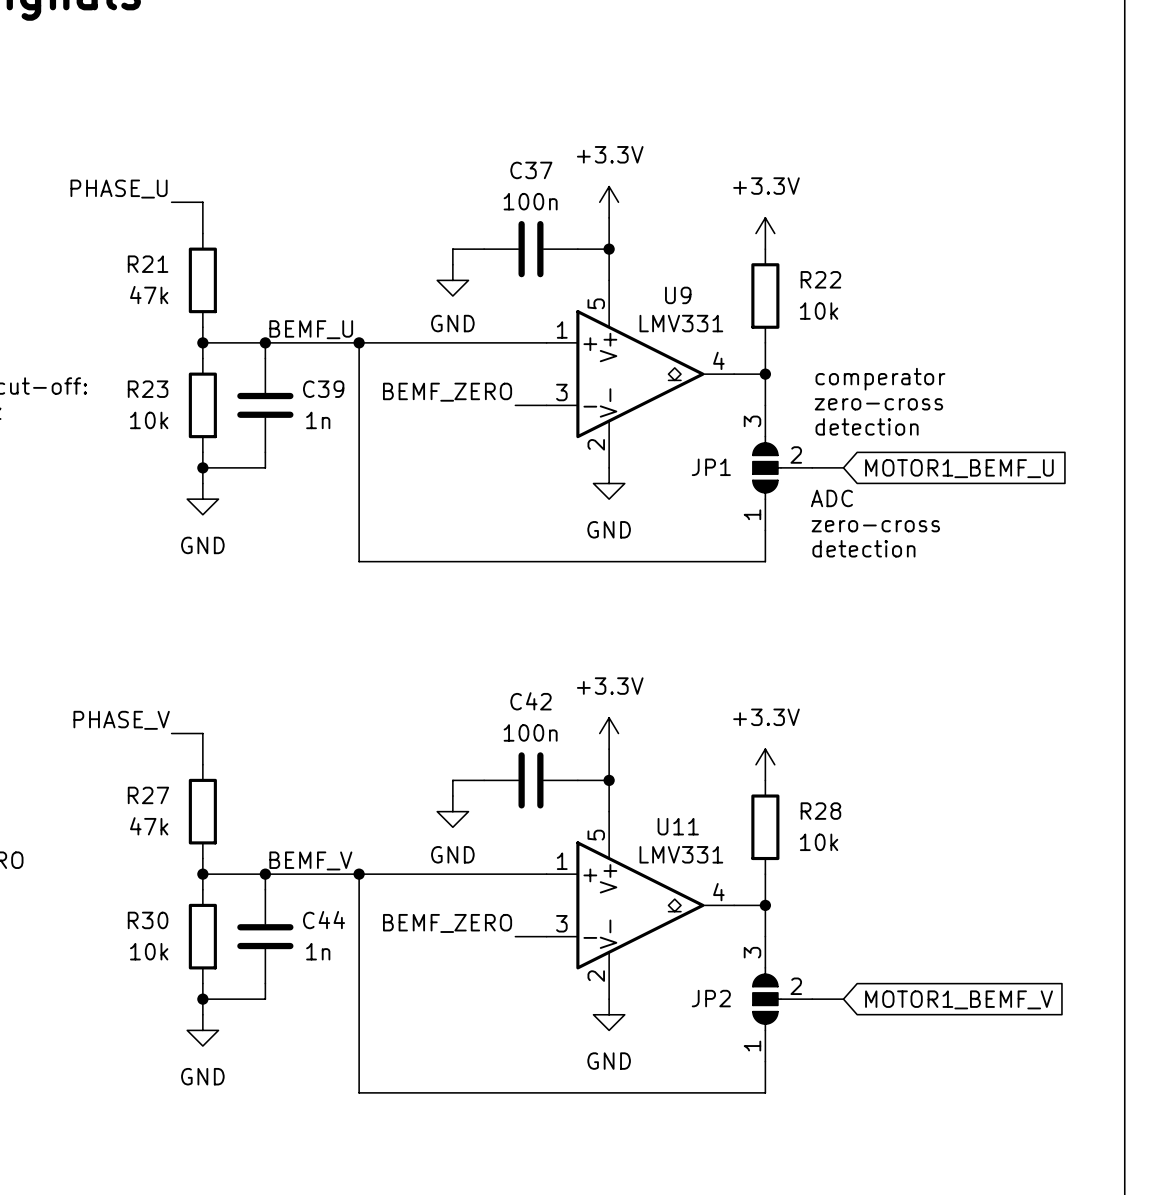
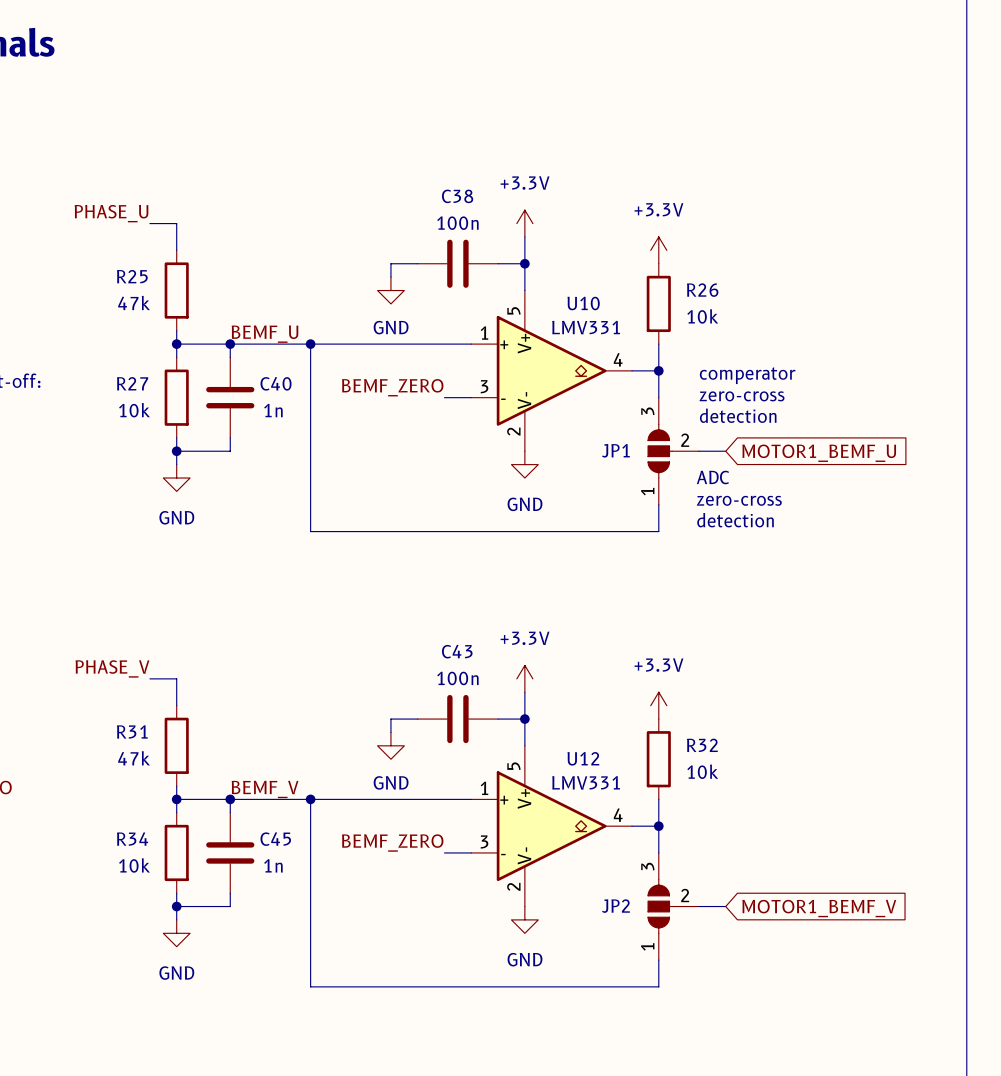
C37 name: C37 (531, 170) -> C38 (457, 196)
R21 name: R21 (148, 264) -> R25 (132, 276)
R22 name: R22 (820, 279) -> R26 (702, 290)
U9 name: U9 (678, 295) -> U10 (583, 303)
R23 name: R23 (148, 389) -> R27 (132, 383)
C39 name: C39 (323, 389) -> C40 (276, 383)
C42 name: C42 (531, 701) -> C43 (457, 651)
R27 name: R27 (148, 795) -> R31 (132, 731)
R28 name: R28 (820, 811) -> R32 (702, 745)
U11 name: U11 (678, 826) -> U12 (583, 758)
R30 name: R30 (148, 920) -> R34 (132, 839)
C44 name: C44 (324, 920) -> C45 (275, 839)

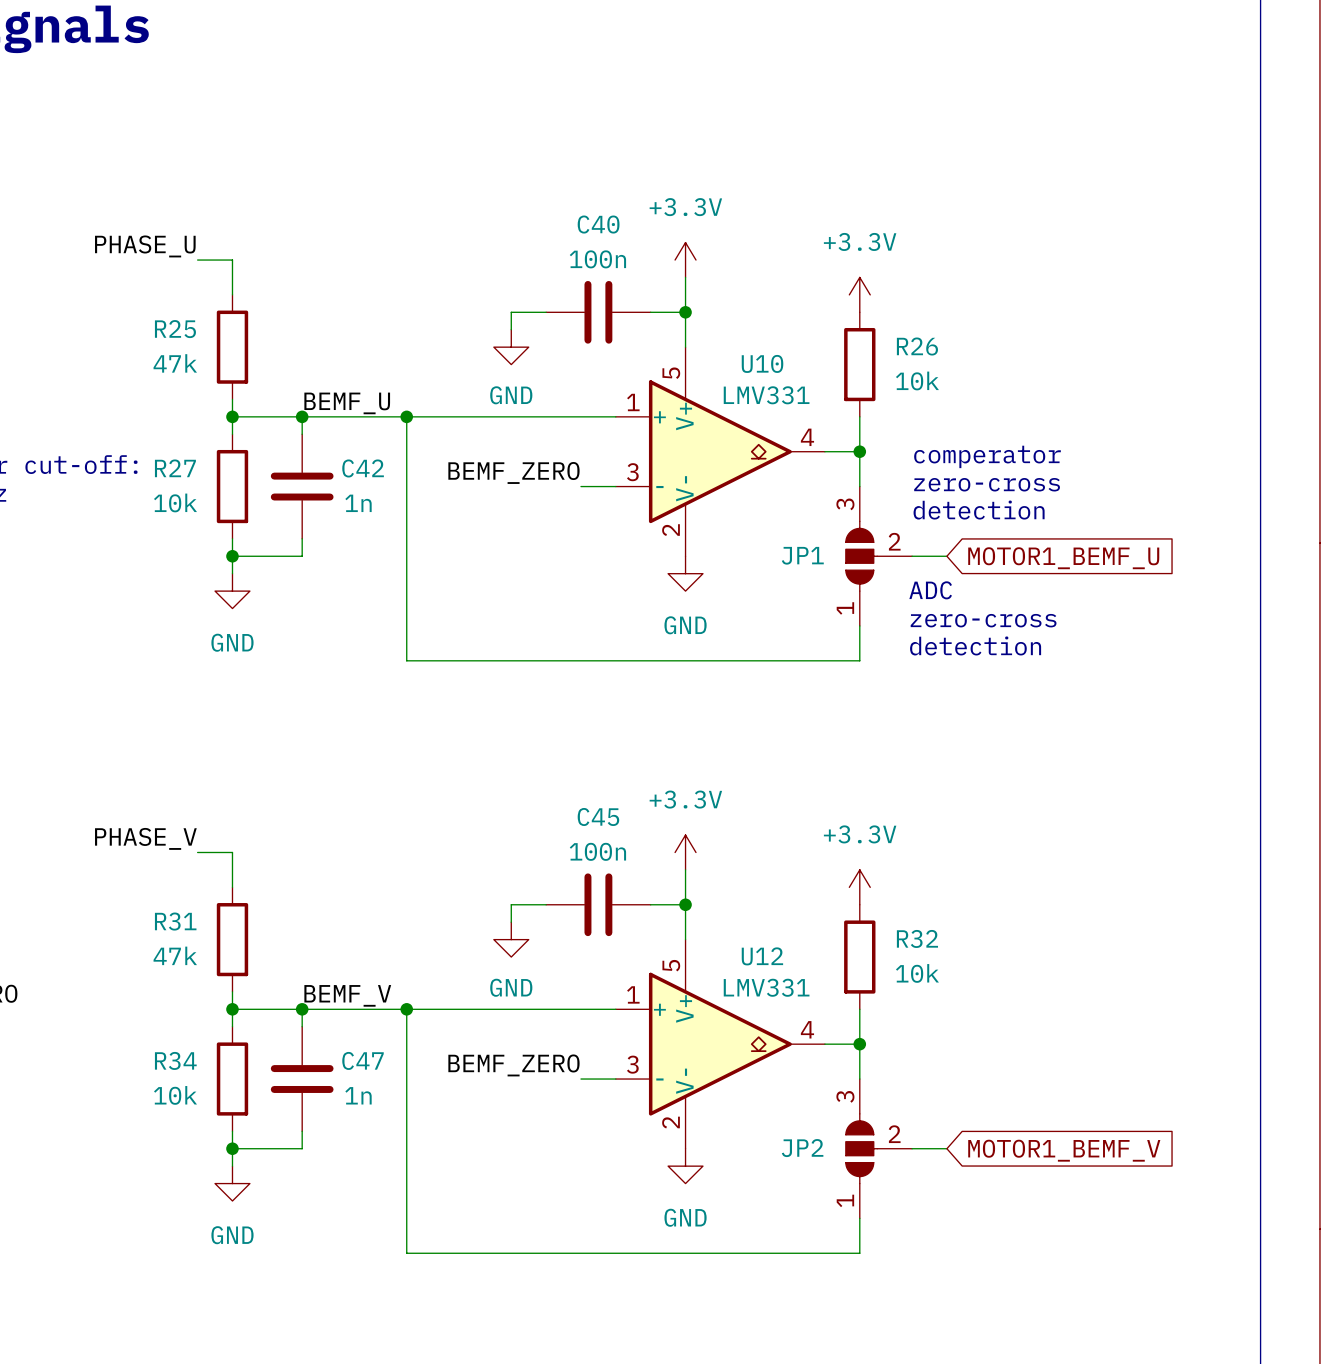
C38 name: C38 (457, 196) -> C40 (598, 224)
C40 name: C40 (276, 383) -> C42 (363, 468)
C43 name: C43 (457, 651) -> C45 (598, 816)
C45 name: C45 (275, 839) -> C47 (363, 1060)

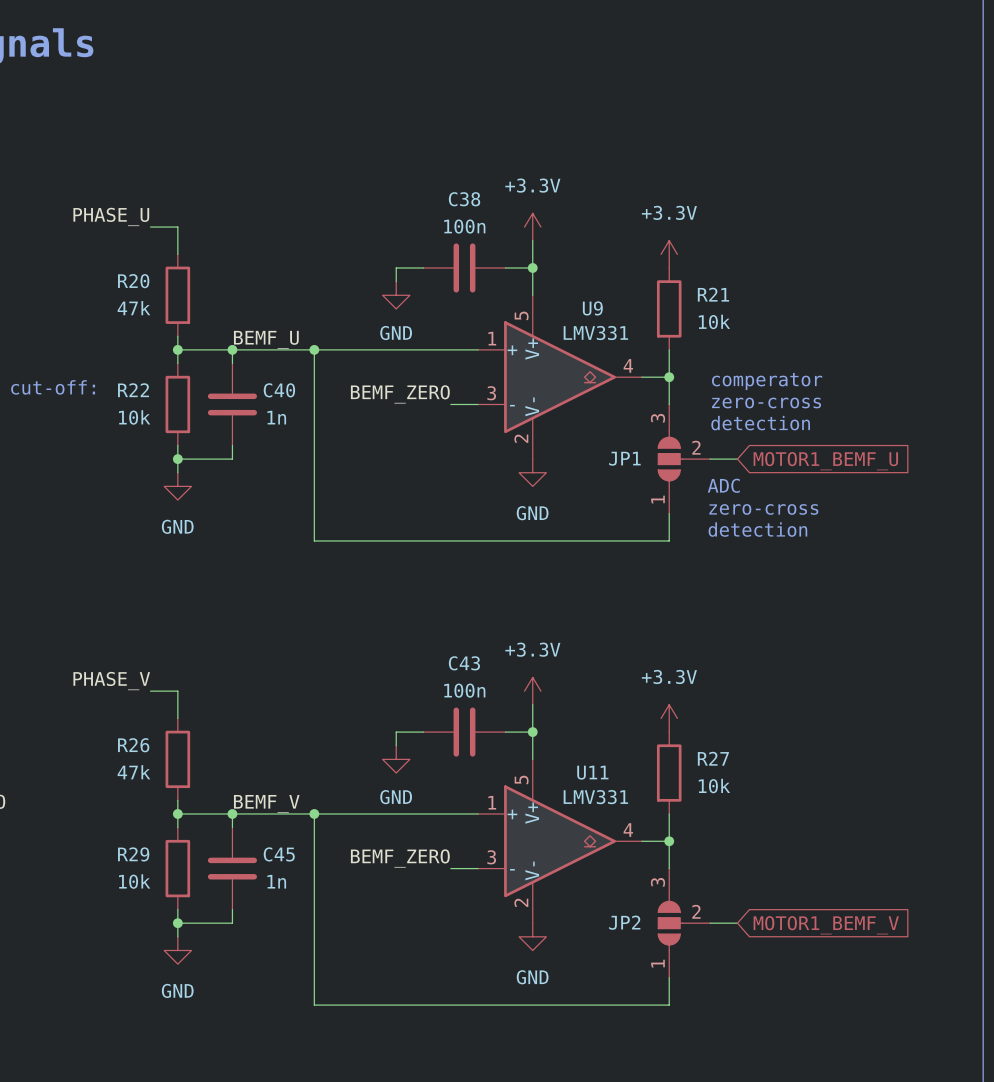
C40 name: C40 (598, 224) -> C38 (464, 199)
R25 name: R25 (175, 329) -> R20 (133, 281)
R26 name: R26 (917, 346) -> R21 (713, 294)
U10 name: U10 (762, 363) -> U9 (592, 308)
R27 name: R27 (175, 468) -> R22 (133, 390)
C42 name: C42 (363, 468) -> C40 (279, 390)
C45 name: C45 (598, 816) -> C43 (464, 663)
R31 name: R31 (175, 921) -> R26 (133, 745)
R32 name: R32 (917, 938) -> R27 (713, 758)
U12 name: U12 (762, 956) -> U11 (592, 772)
R34 name: R34 (175, 1060) -> R29 (133, 854)
C47 name: C47 (363, 1060) -> C45 (279, 854)

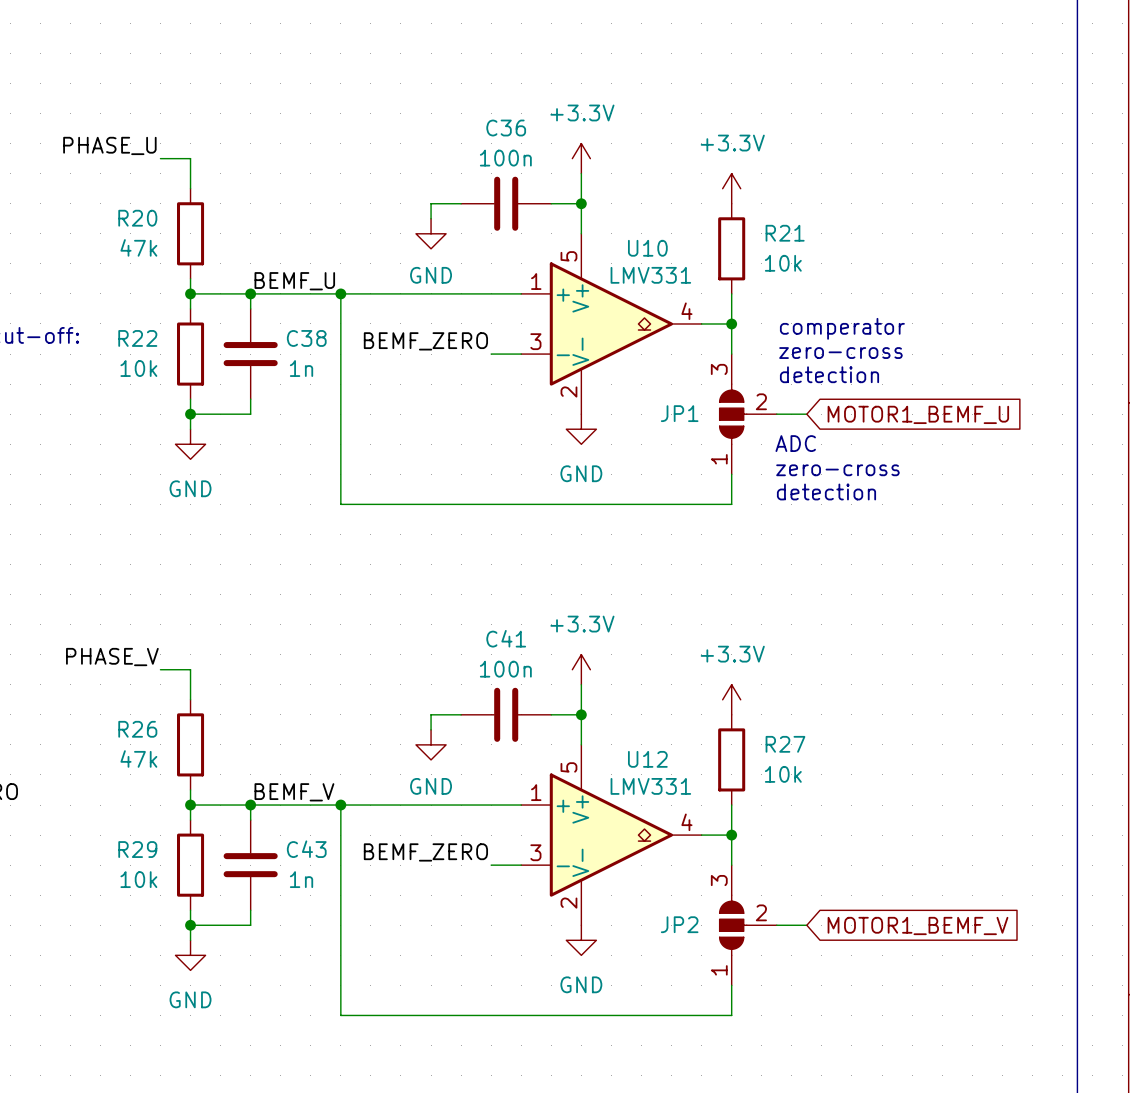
C38 name: C38 (464, 199) -> C36 (506, 128)
U9 name: U9 (592, 308) -> U10 (647, 248)
C40 name: C40 (279, 390) -> C38 (306, 338)
C43 name: C43 (464, 663) -> C41 (506, 638)
U11 name: U11 (592, 772) -> U12 (647, 759)
C45 name: C45 (279, 854) -> C43 (306, 849)

